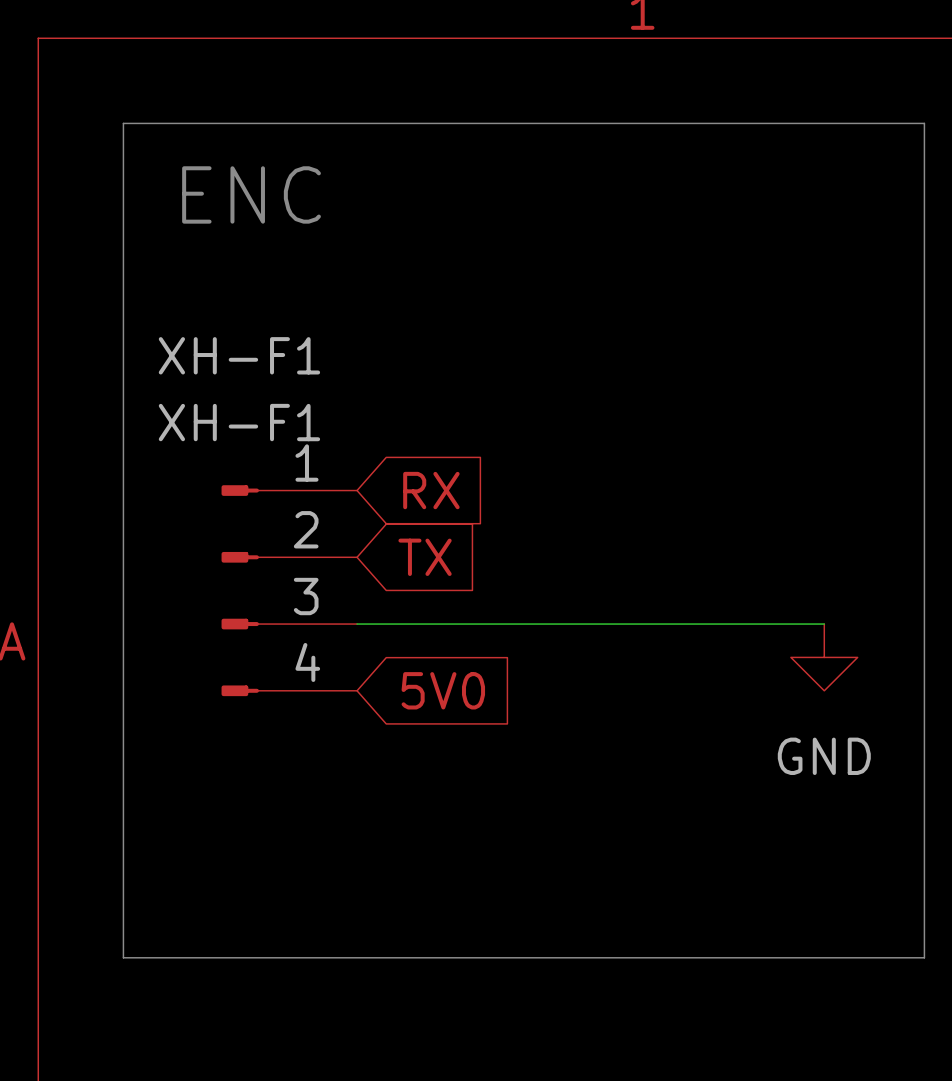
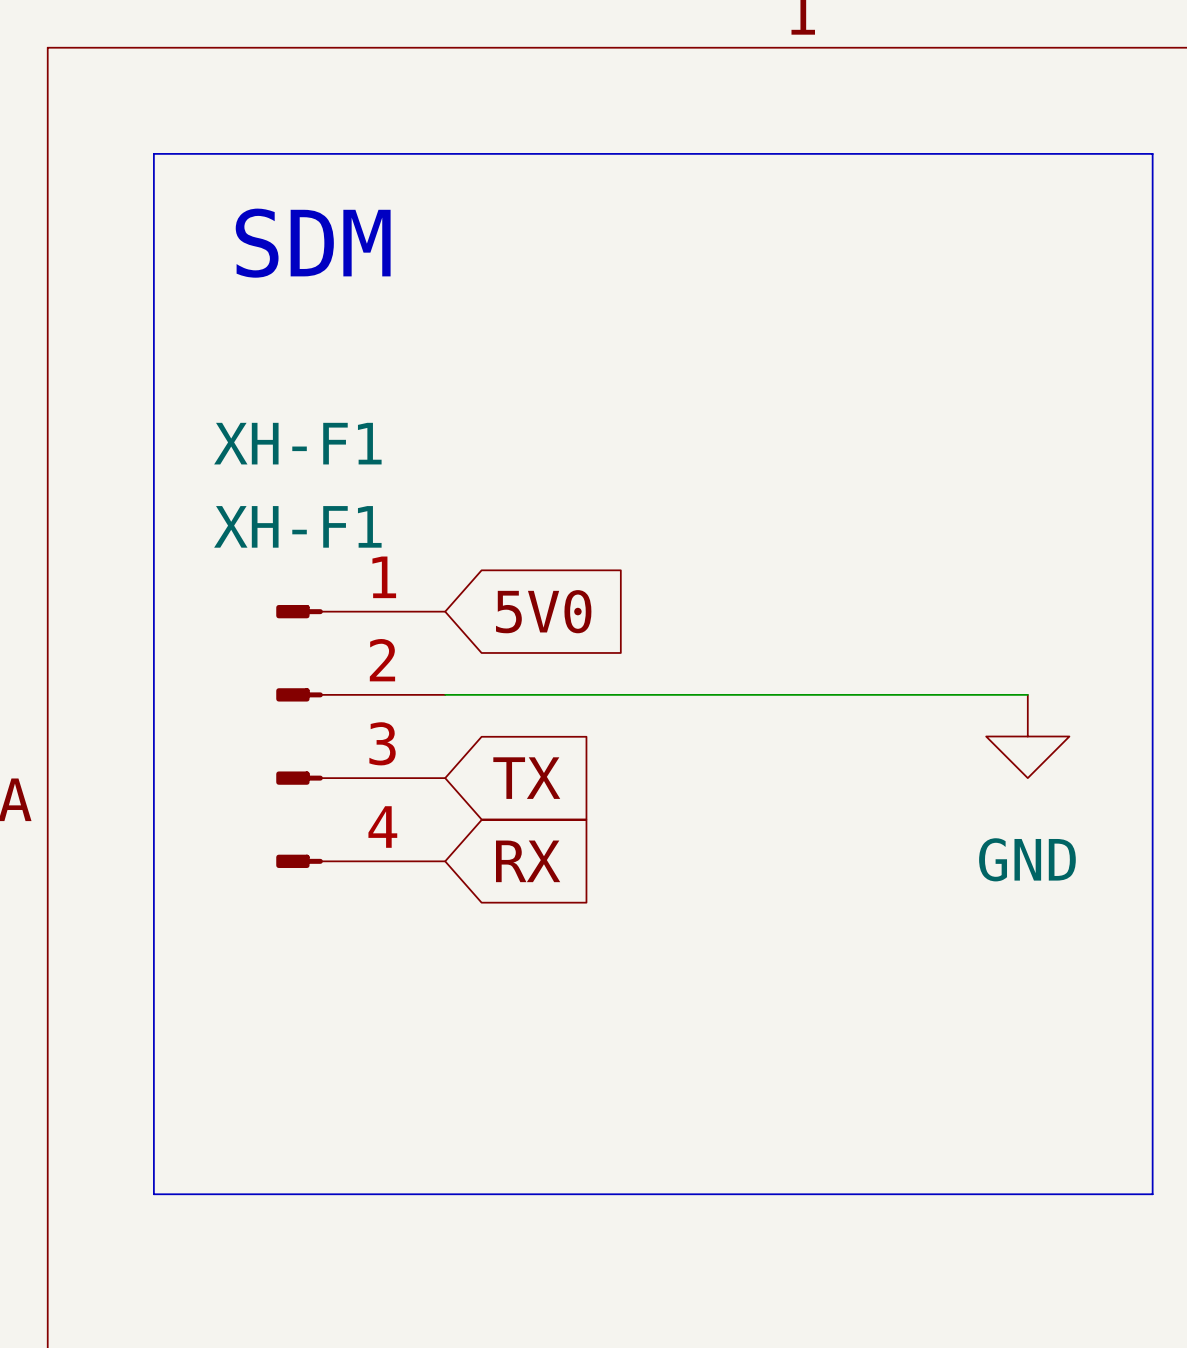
text: ENC (251, 194) -> SDM (313, 243)
global label: RX (431, 490) -> 5V0 (543, 611)
global label position: TX (425, 557) -> TX (526, 778)
wire: (357, 624) (824, 624) -> (445, 694) (1027, 694)
power symbol position: GND (824, 657) -> GND (1027, 736)
global label: 5V0 (443, 690) -> RX (528, 861)

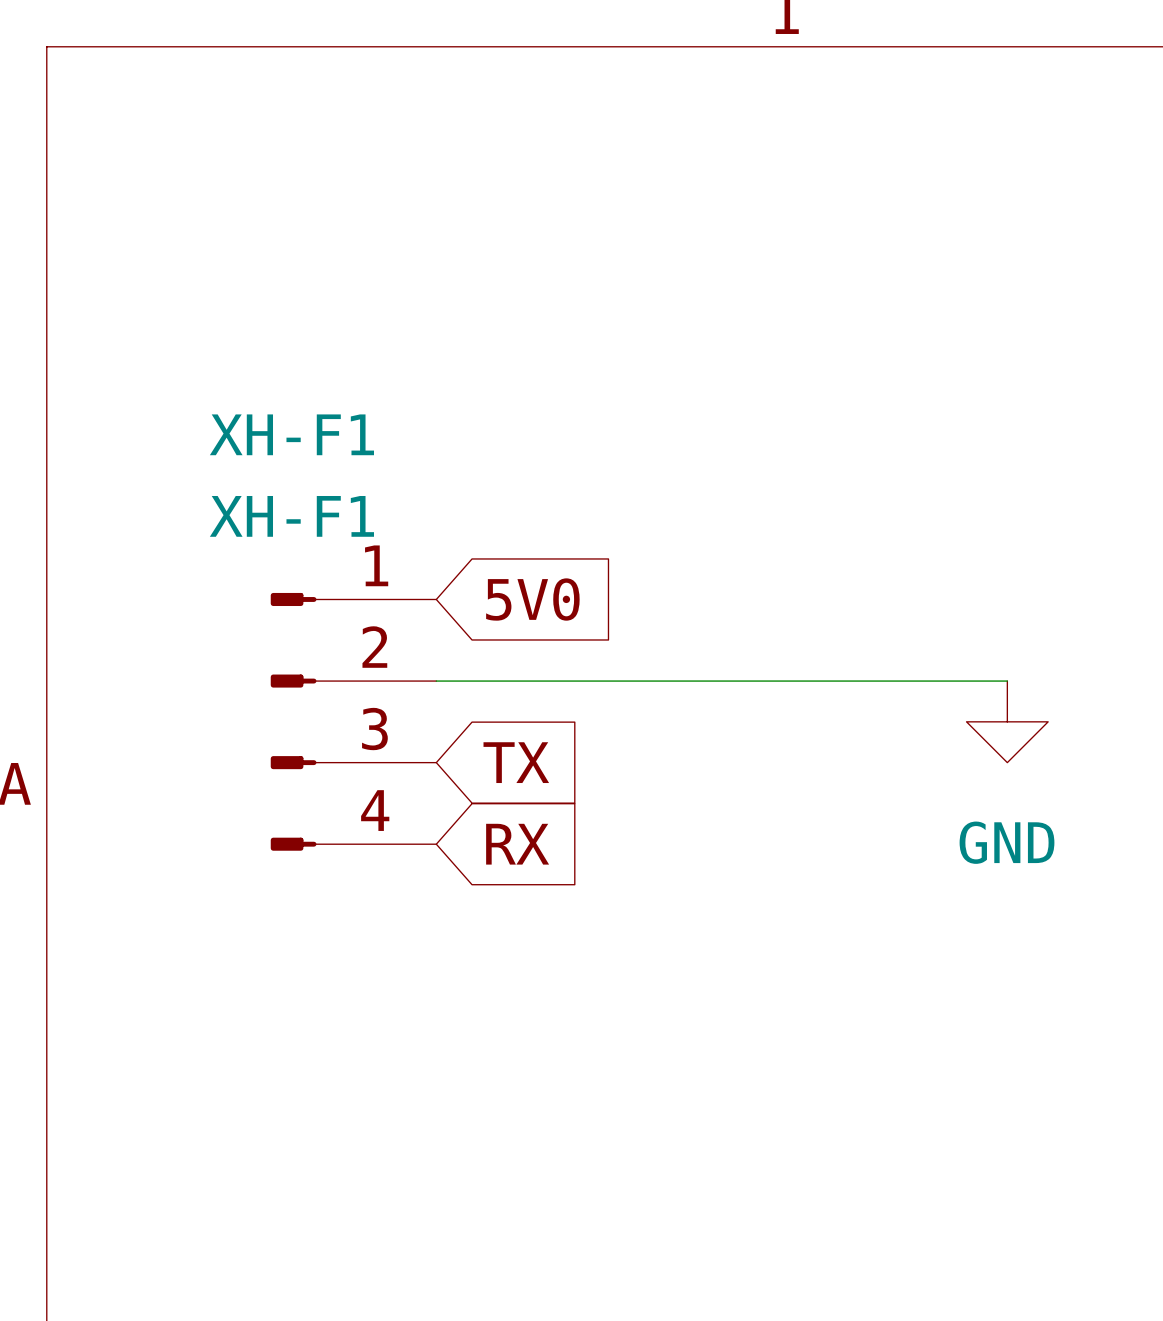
line: (153, 153) (1152, 153) (1152, 1194) (153, 1194) (153, 153) -> none
text: SDM (313, 243) -> none

